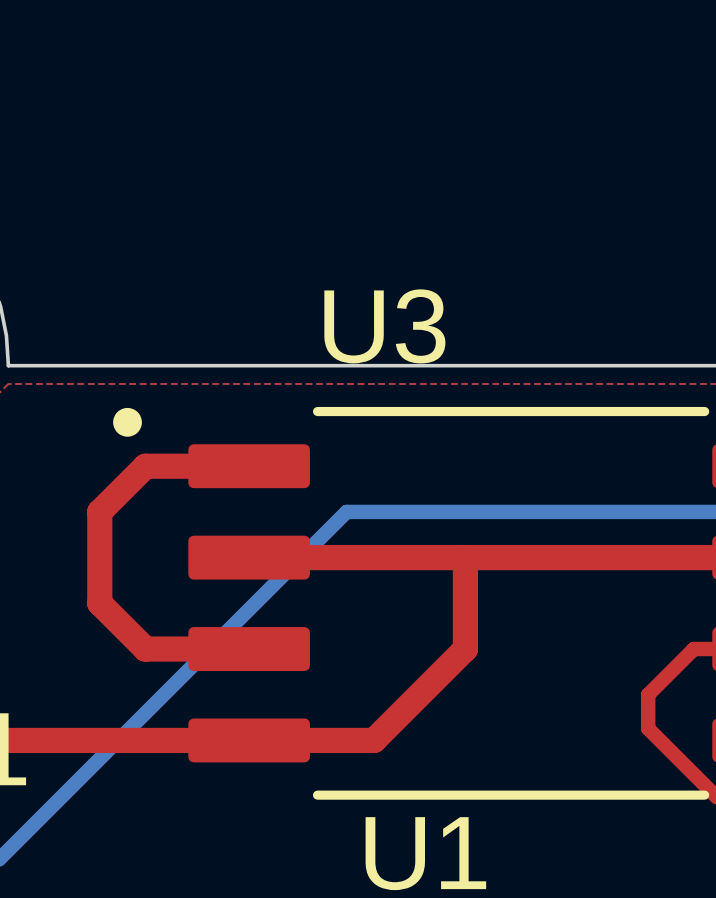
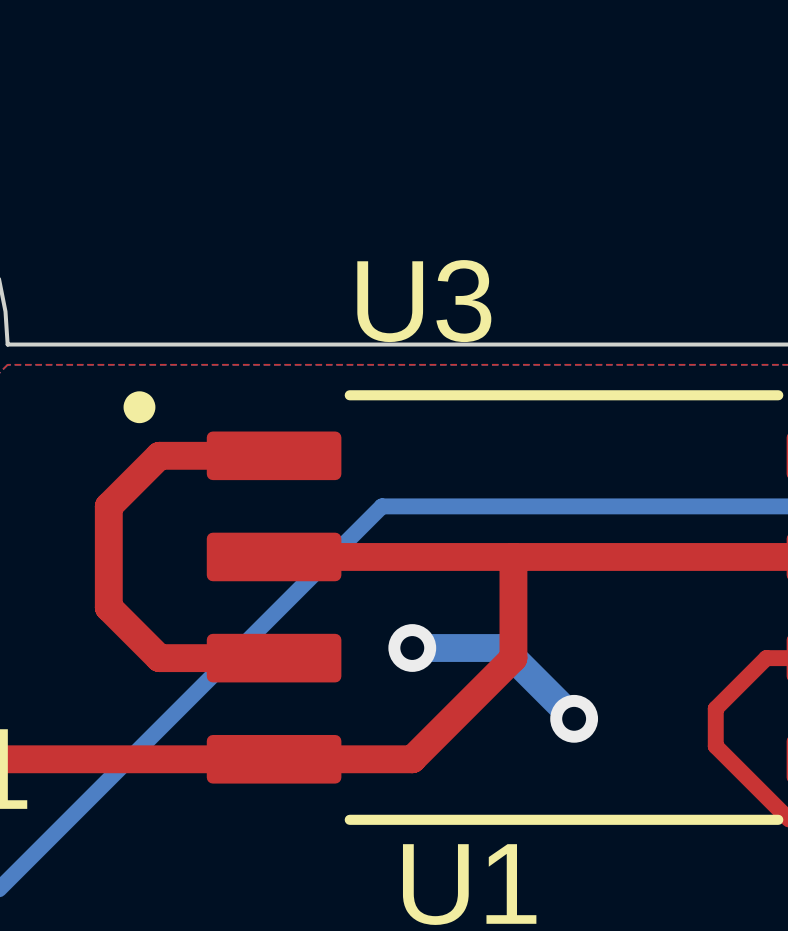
bottom track: none -> (412, 648) (503, 648) (574, 718)
via: none -> (412, 648)
via: none -> (574, 718)

